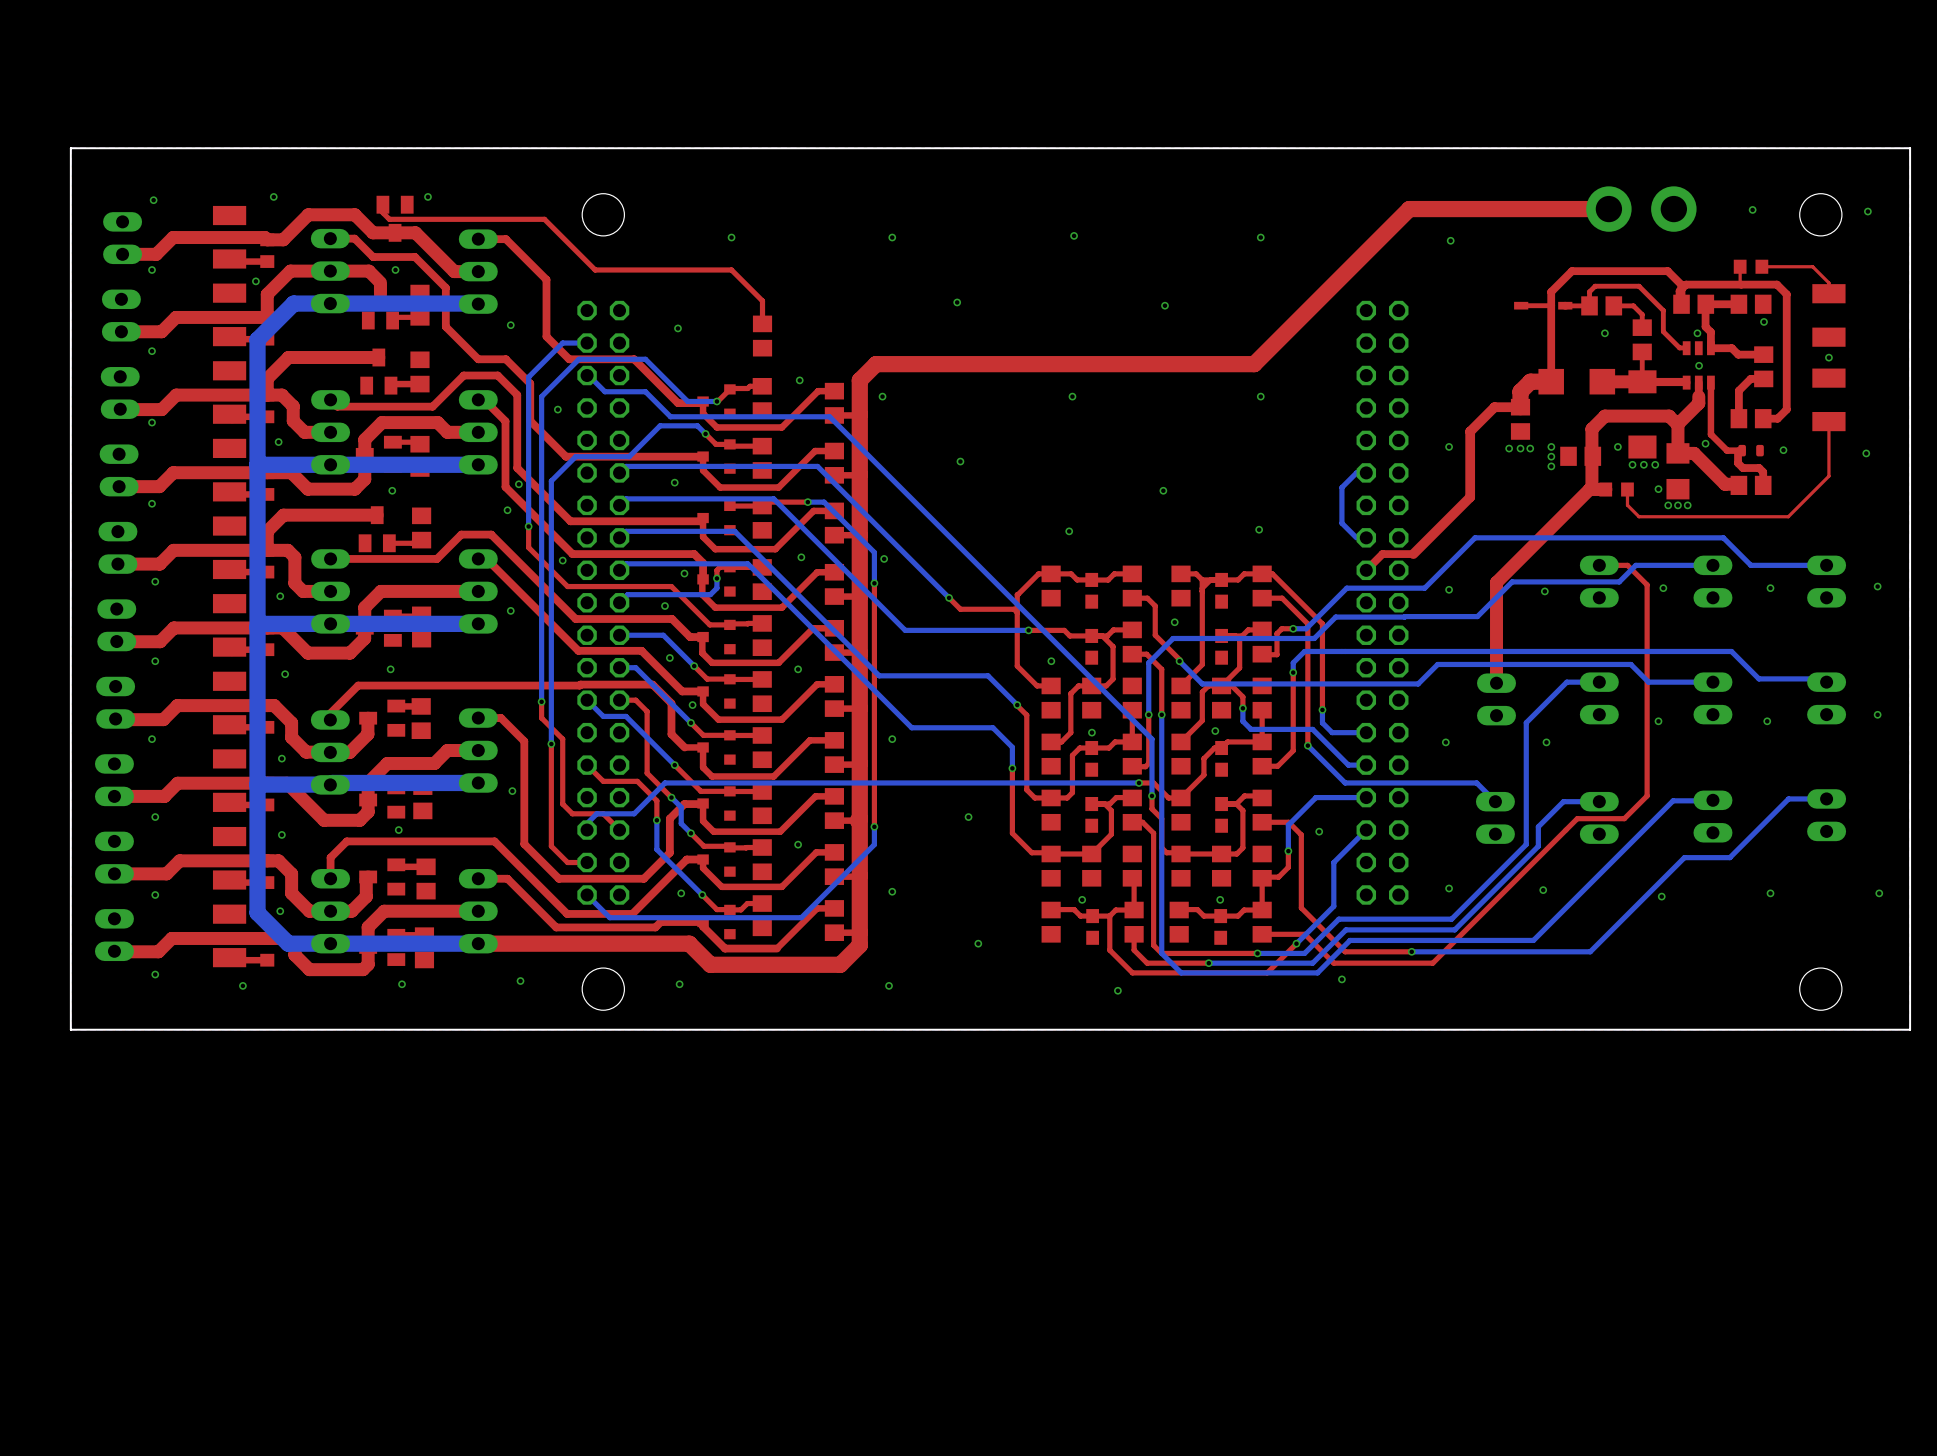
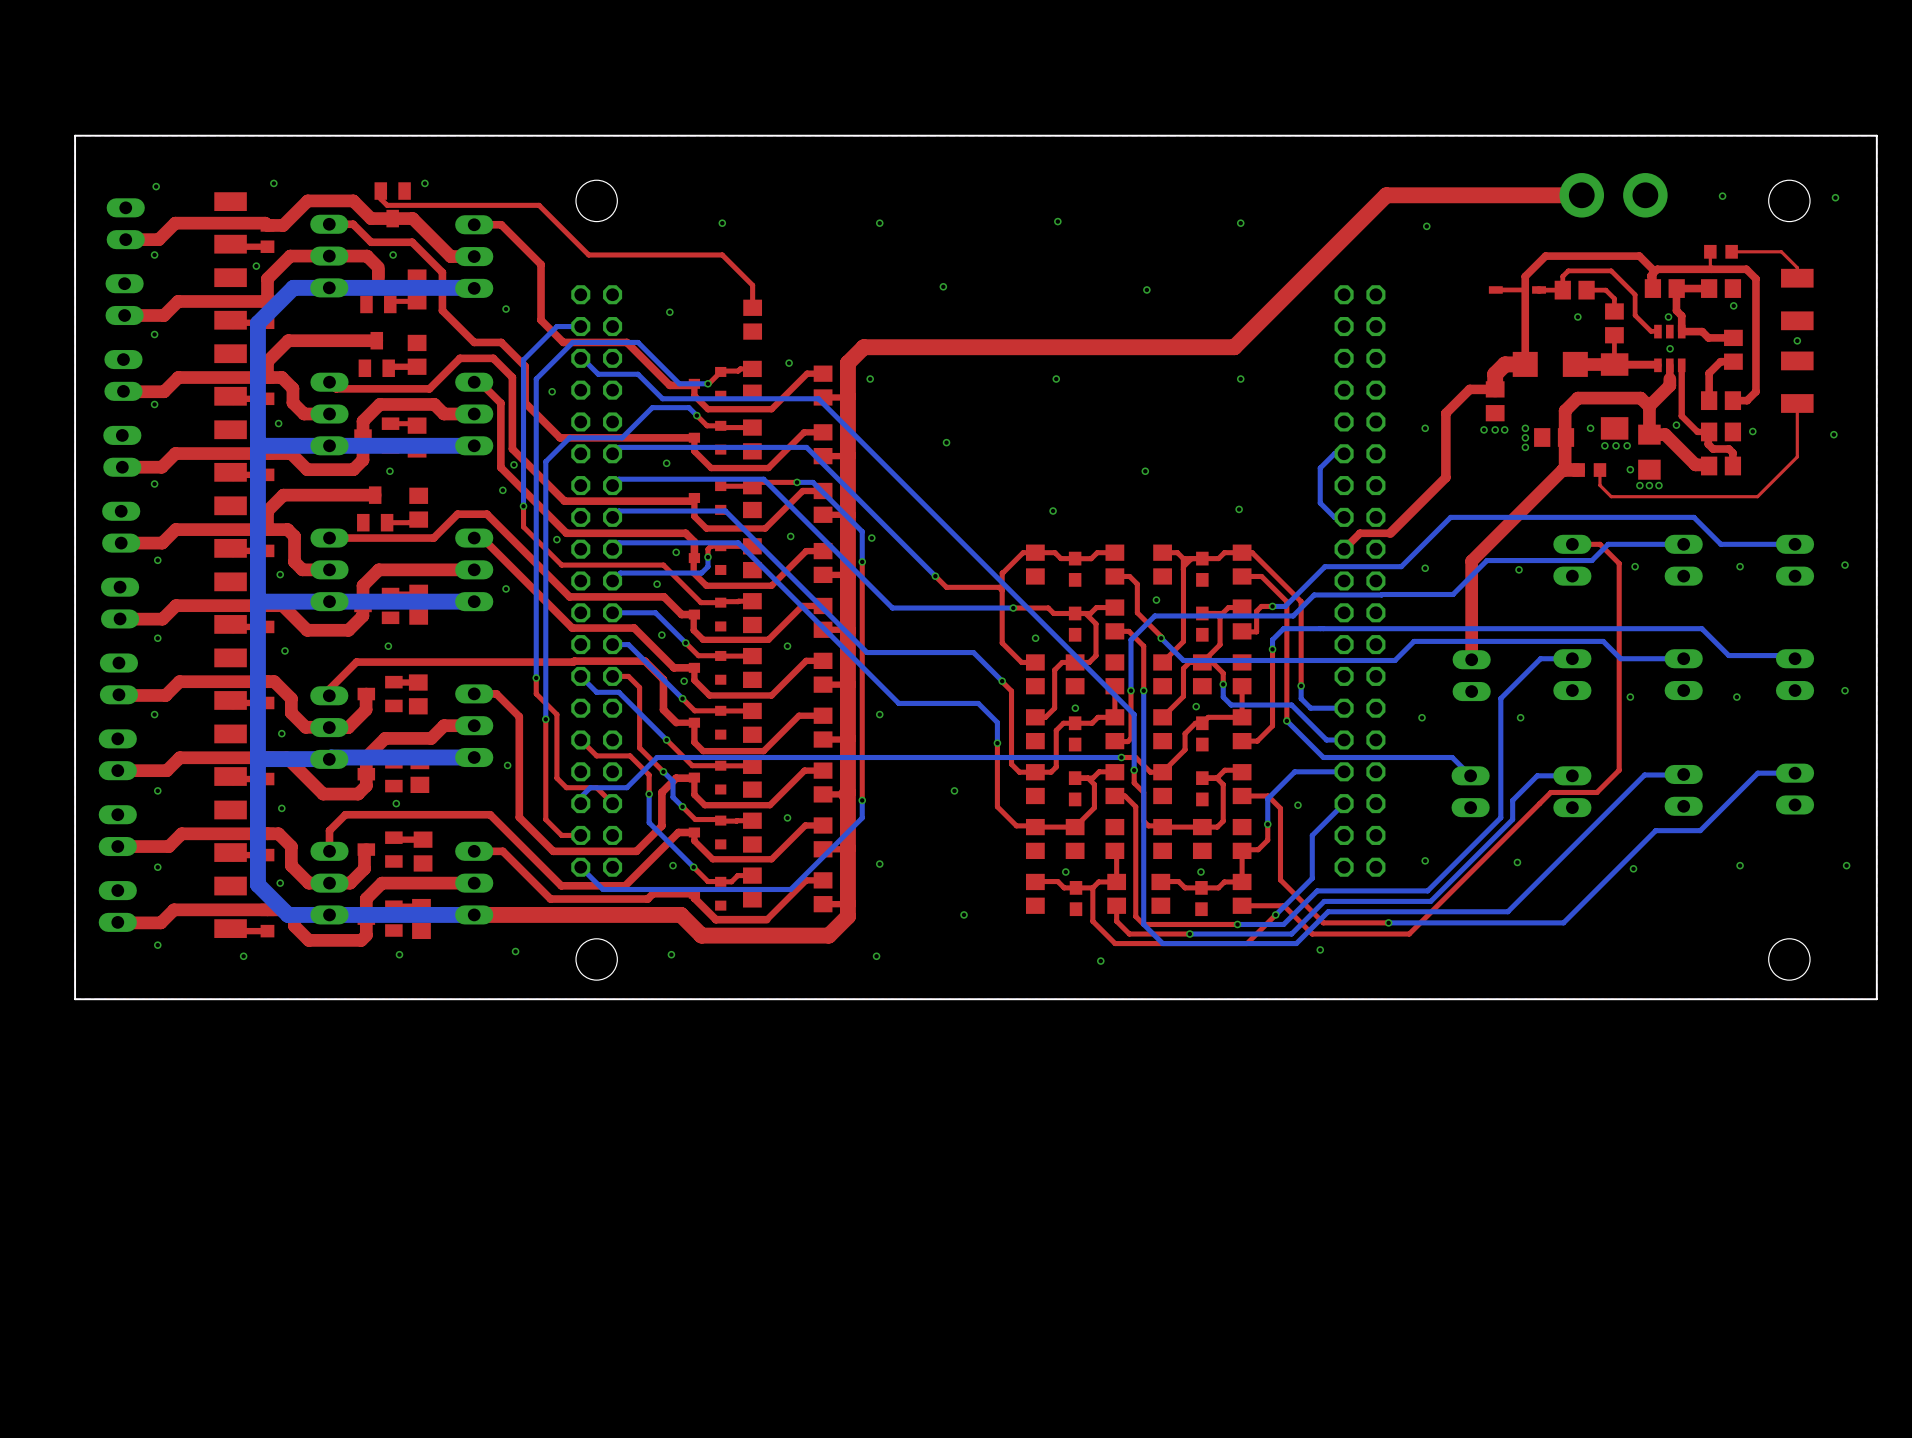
part footprint: [1738, 444, 1764, 457] -> [1700, 422, 1742, 442]

